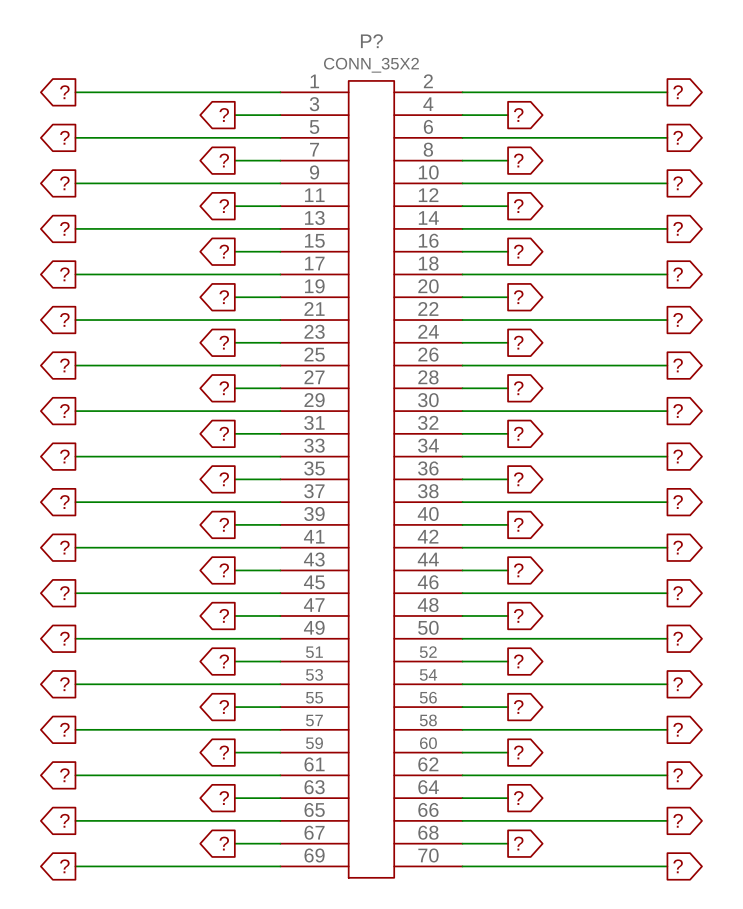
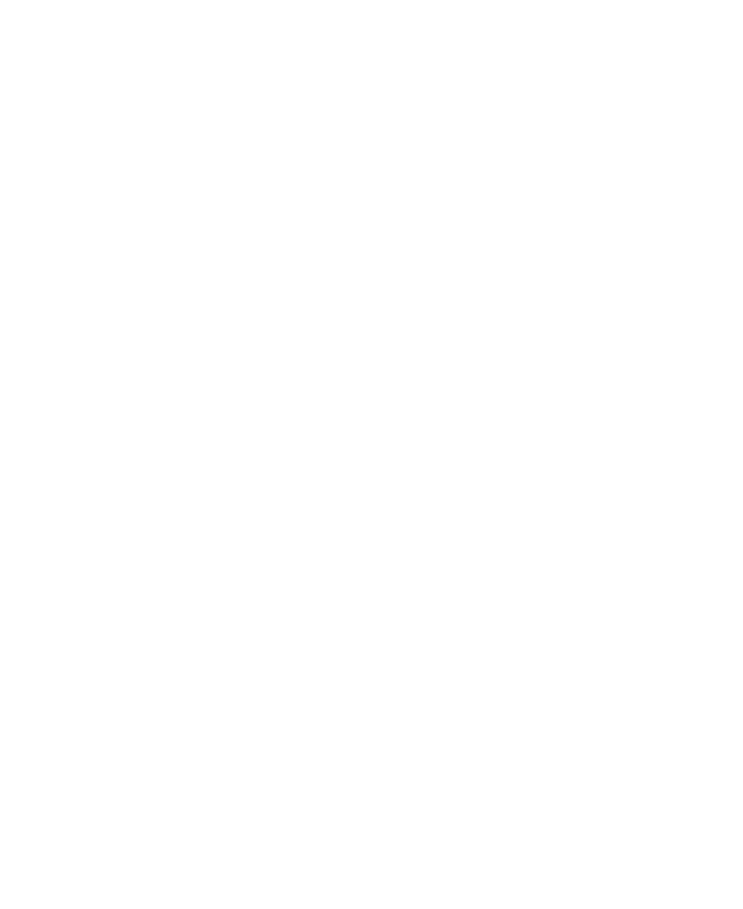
global label: ? (64, 92) -> none
wire: (75, 92) (280, 92) -> none
wire: (462, 92) (667, 92) -> none
global label: ? (678, 92) -> none
global label: ? (224, 115) -> none
wire: (234, 115) (280, 115) -> none
wire: (462, 115) (508, 115) -> none
global label: ? (518, 115) -> none
global label: ? (64, 137) -> none
wire: (75, 137) (280, 137) -> none
wire: (462, 137) (667, 137) -> none
global label: ? (678, 137) -> none
global label: ? (224, 160) -> none
wire: (234, 160) (280, 160) -> none
wire: (462, 160) (508, 160) -> none
global label: ? (518, 160) -> none
global label: ? (64, 183) -> none
wire: (75, 183) (280, 183) -> none
wire: (462, 183) (667, 183) -> none
global label: ? (678, 183) -> none
global label: ? (224, 206) -> none
wire: (234, 206) (280, 206) -> none
wire: (462, 206) (508, 206) -> none
global label: ? (518, 206) -> none
global label: ? (64, 228) -> none
wire: (75, 228) (280, 228) -> none
wire: (462, 228) (667, 228) -> none
global label: ? (678, 228) -> none
global label: ? (224, 251) -> none
wire: (234, 251) (280, 251) -> none
wire: (462, 251) (508, 251) -> none
global label: ? (518, 251) -> none
global label: ? (64, 274) -> none
wire: (75, 274) (280, 274) -> none
wire: (462, 274) (667, 274) -> none
global label: ? (678, 274) -> none
global label: ? (224, 297) -> none
wire: (234, 297) (280, 297) -> none
wire: (462, 297) (508, 297) -> none
global label: ? (518, 297) -> none
global label: ? (64, 319) -> none
global label: ? (678, 319) -> none
wire: (75, 320) (280, 320) -> none
wire: (462, 320) (667, 320) -> none
global label: ? (224, 342) -> none
wire: (234, 342) (280, 342) -> none
wire: (462, 342) (508, 342) -> none
global label: ? (518, 342) -> none
global label: ? (64, 365) -> none
wire: (75, 365) (280, 365) -> none
wire: (462, 365) (667, 365) -> none
global label: ? (678, 365) -> none
global label: ? (224, 388) -> none
wire: (234, 388) (280, 388) -> none
wire: (462, 388) (508, 388) -> none
global label: ? (518, 388) -> none
global label: ? (64, 410) -> none
global label: ? (678, 410) -> none
wire: (75, 411) (280, 411) -> none
wire: (462, 411) (667, 411) -> none
global label: ? (224, 433) -> none
wire: (234, 433) (280, 433) -> none
wire: (462, 433) (508, 433) -> none
global label: ? (518, 433) -> none
global label: ? (64, 456) -> none
wire: (75, 456) (280, 456) -> none
wire: (462, 456) (667, 456) -> none
global label: ? (678, 456) -> none
global label: ? (224, 479) -> none
wire: (234, 479) (280, 479) -> none
P?: CONN_35X2 (371, 479) -> none
wire: (462, 479) (508, 479) -> none
global label: ? (518, 479) -> none
global label: ? (64, 502) -> none
wire: (75, 502) (280, 502) -> none
wire: (462, 502) (667, 502) -> none
global label: ? (678, 502) -> none
global label: ? (224, 524) -> none
wire: (234, 524) (280, 524) -> none
wire: (462, 524) (508, 524) -> none
global label: ? (518, 524) -> none
global label: ? (64, 547) -> none
wire: (75, 547) (280, 547) -> none
wire: (462, 547) (667, 547) -> none
global label: ? (678, 547) -> none
global label: ? (224, 570) -> none
wire: (234, 570) (280, 570) -> none
wire: (462, 570) (508, 570) -> none
global label: ? (518, 570) -> none
global label: ? (64, 593) -> none
wire: (75, 593) (280, 593) -> none
wire: (462, 593) (667, 593) -> none
global label: ? (678, 593) -> none
global label: ? (224, 615) -> none
wire: (234, 615) (280, 615) -> none
wire: (462, 615) (508, 615) -> none
global label: ? (518, 615) -> none
global label: ? (64, 638) -> none
wire: (75, 638) (280, 638) -> none
wire: (462, 638) (667, 638) -> none
global label: ? (678, 638) -> none
global label: ? (224, 661) -> none
wire: (234, 661) (280, 661) -> none
wire: (462, 661) (508, 661) -> none
global label: ? (518, 661) -> none
global label: ? (64, 684) -> none
wire: (75, 684) (280, 684) -> none
wire: (462, 684) (667, 684) -> none
global label: ? (678, 684) -> none
global label: ? (224, 706) -> none
global label: ? (518, 706) -> none
wire: (234, 707) (280, 707) -> none
wire: (462, 707) (508, 707) -> none
global label: ? (64, 729) -> none
wire: (75, 729) (280, 729) -> none
wire: (462, 729) (667, 729) -> none
global label: ? (678, 729) -> none
global label: ? (224, 752) -> none
wire: (234, 752) (280, 752) -> none
wire: (462, 752) (508, 752) -> none
global label: ? (518, 752) -> none
global label: ? (64, 775) -> none
wire: (75, 775) (280, 775) -> none
wire: (462, 775) (667, 775) -> none
global label: ? (678, 775) -> none
global label: ? (224, 798) -> none
wire: (234, 798) (280, 798) -> none
wire: (462, 798) (508, 798) -> none
global label: ? (518, 798) -> none
global label: ? (64, 820) -> none
wire: (75, 820) (280, 820) -> none
wire: (462, 820) (667, 820) -> none
global label: ? (678, 820) -> none
global label: ? (224, 843) -> none
wire: (234, 843) (280, 843) -> none
wire: (462, 843) (508, 843) -> none
global label: ? (518, 843) -> none
global label: ? (64, 866) -> none
wire: (75, 866) (280, 866) -> none
wire: (462, 866) (667, 866) -> none
global label: ? (678, 866) -> none

